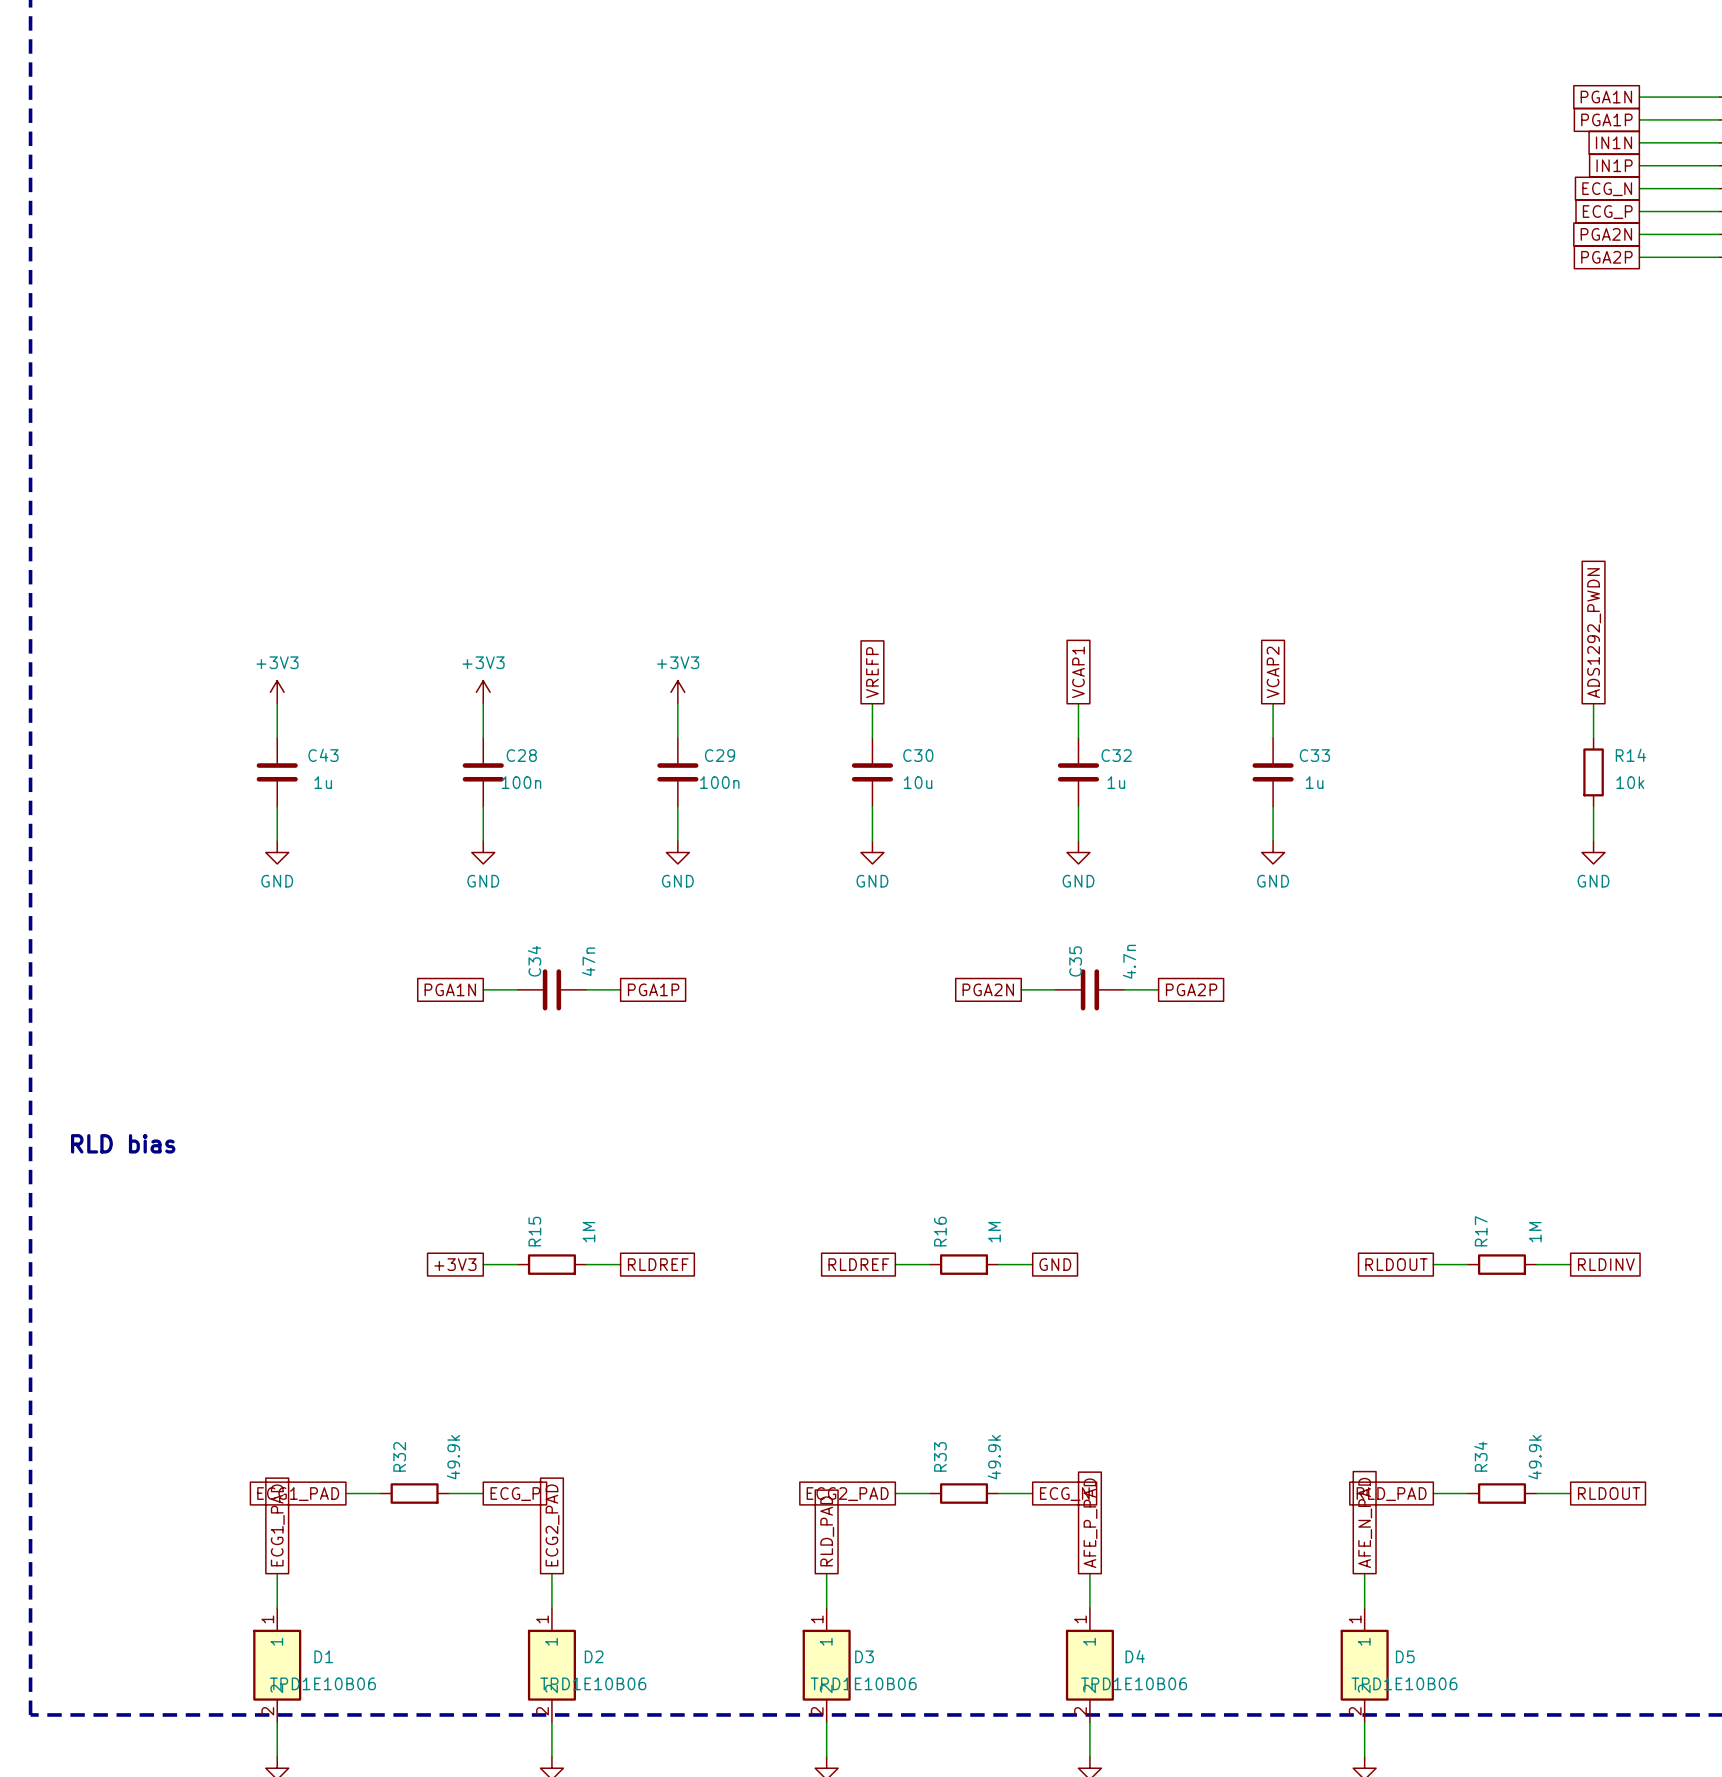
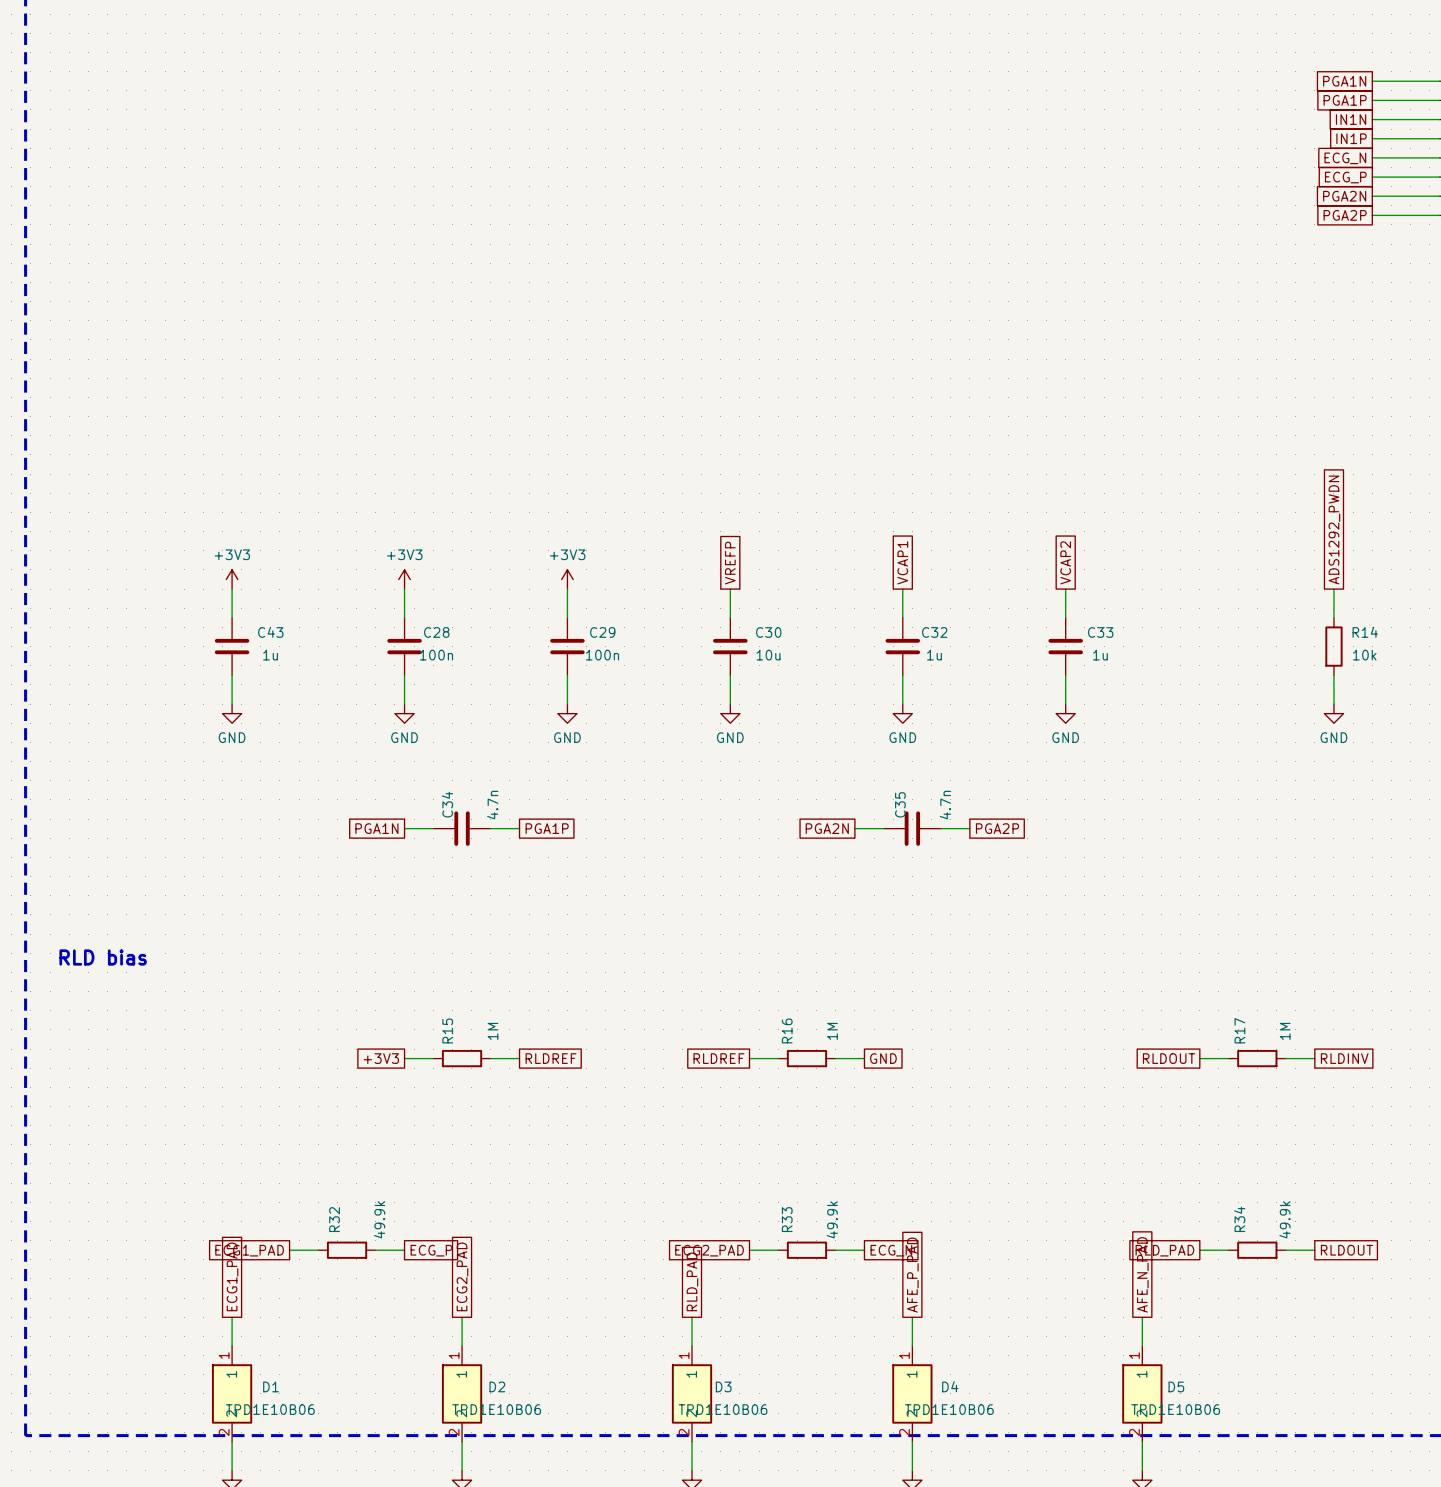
C34 value: 47n (588, 961) -> 4.7n (492, 805)

